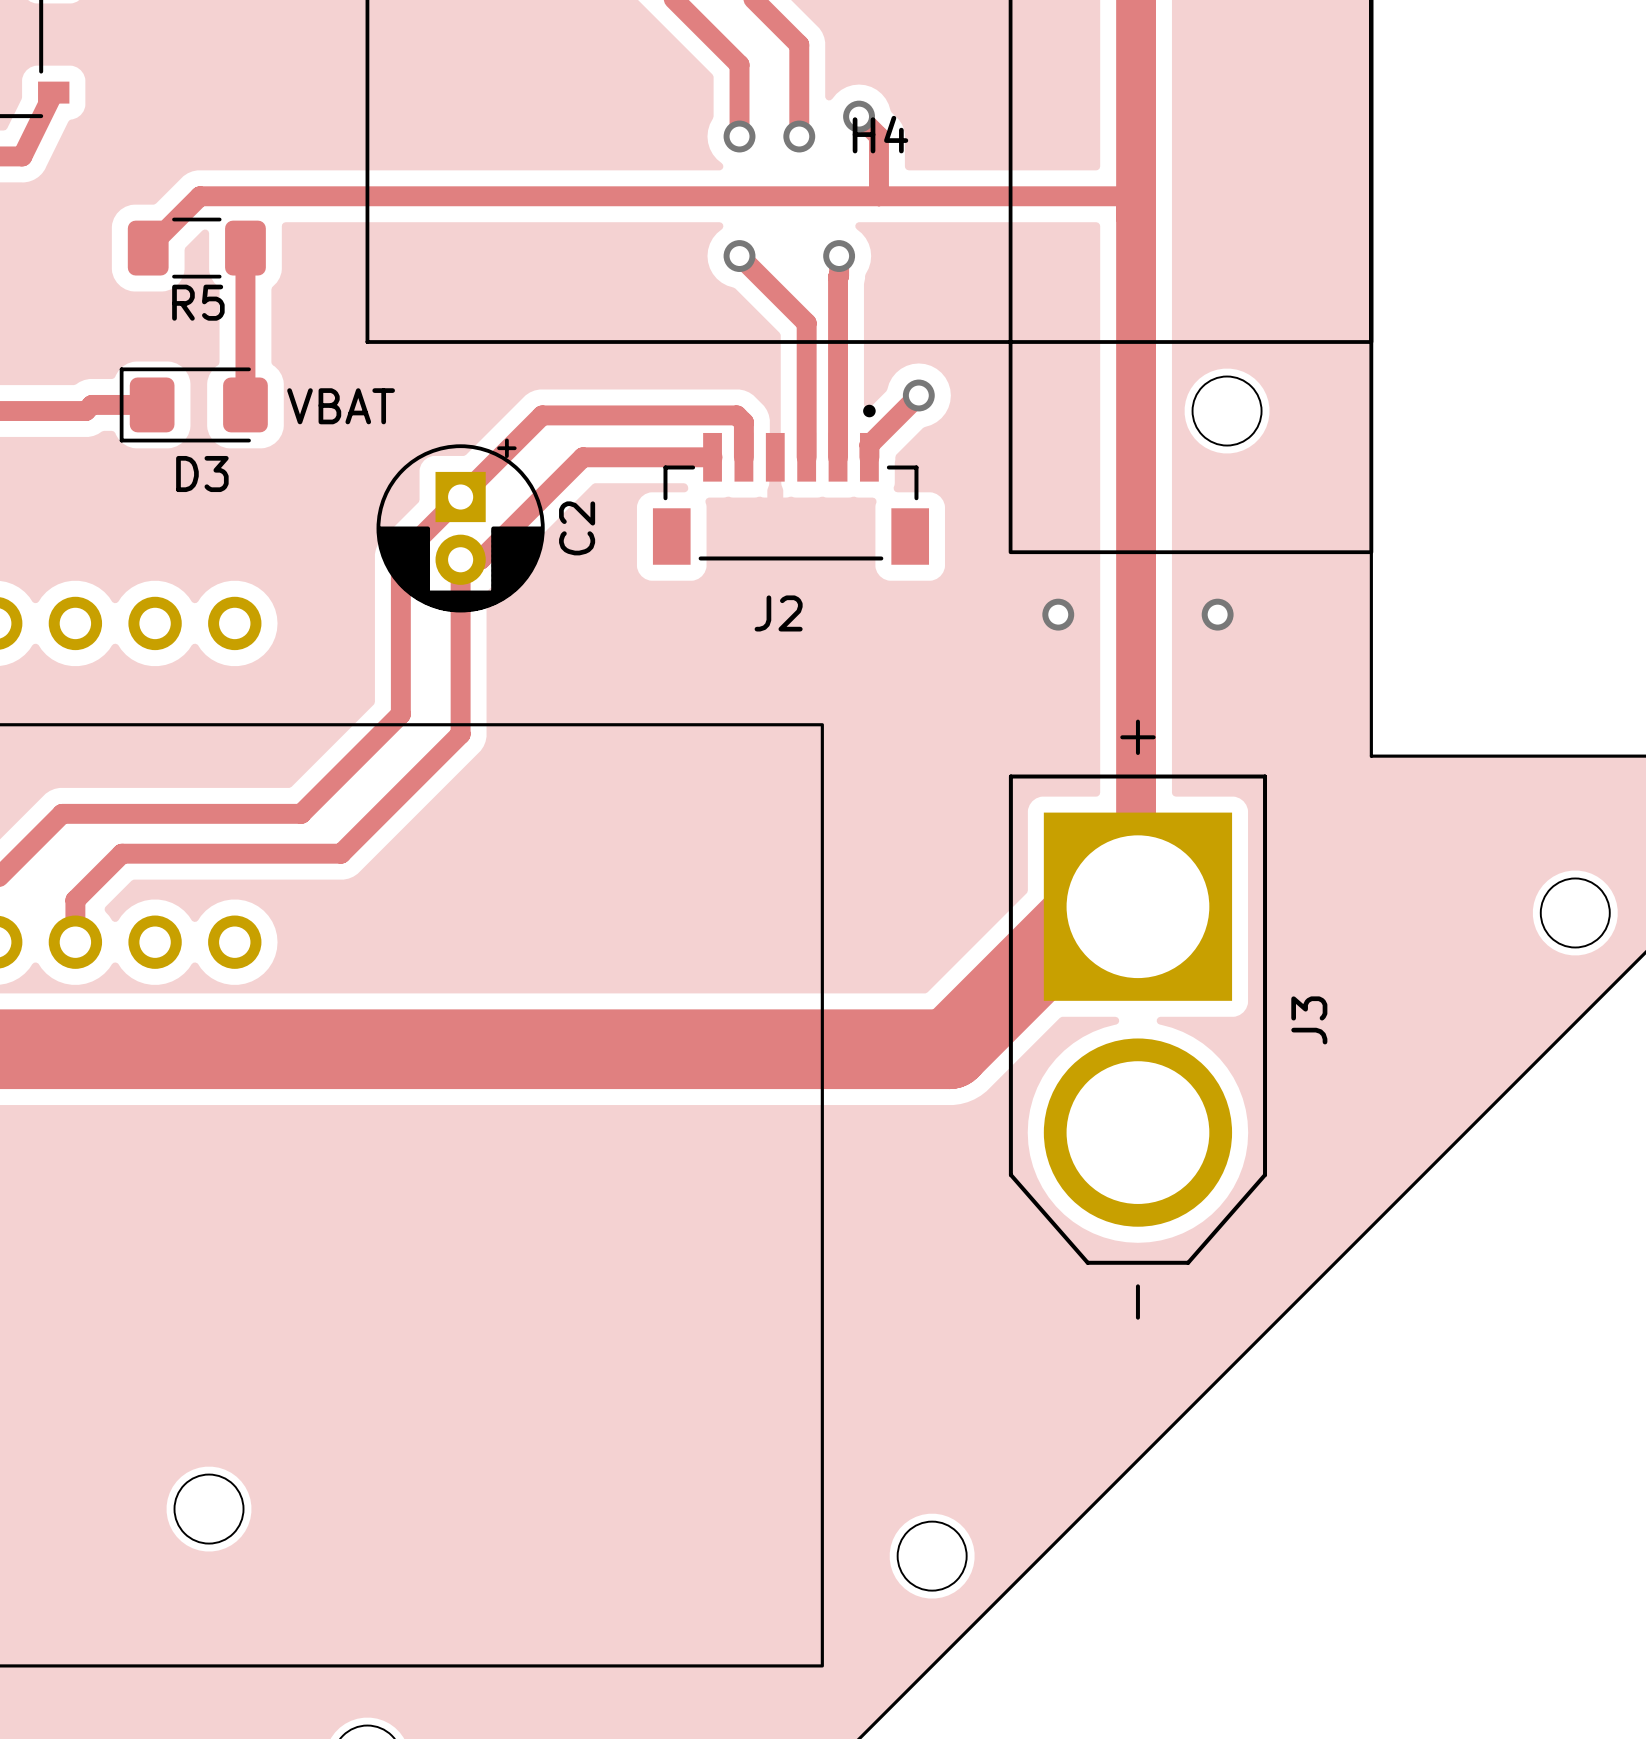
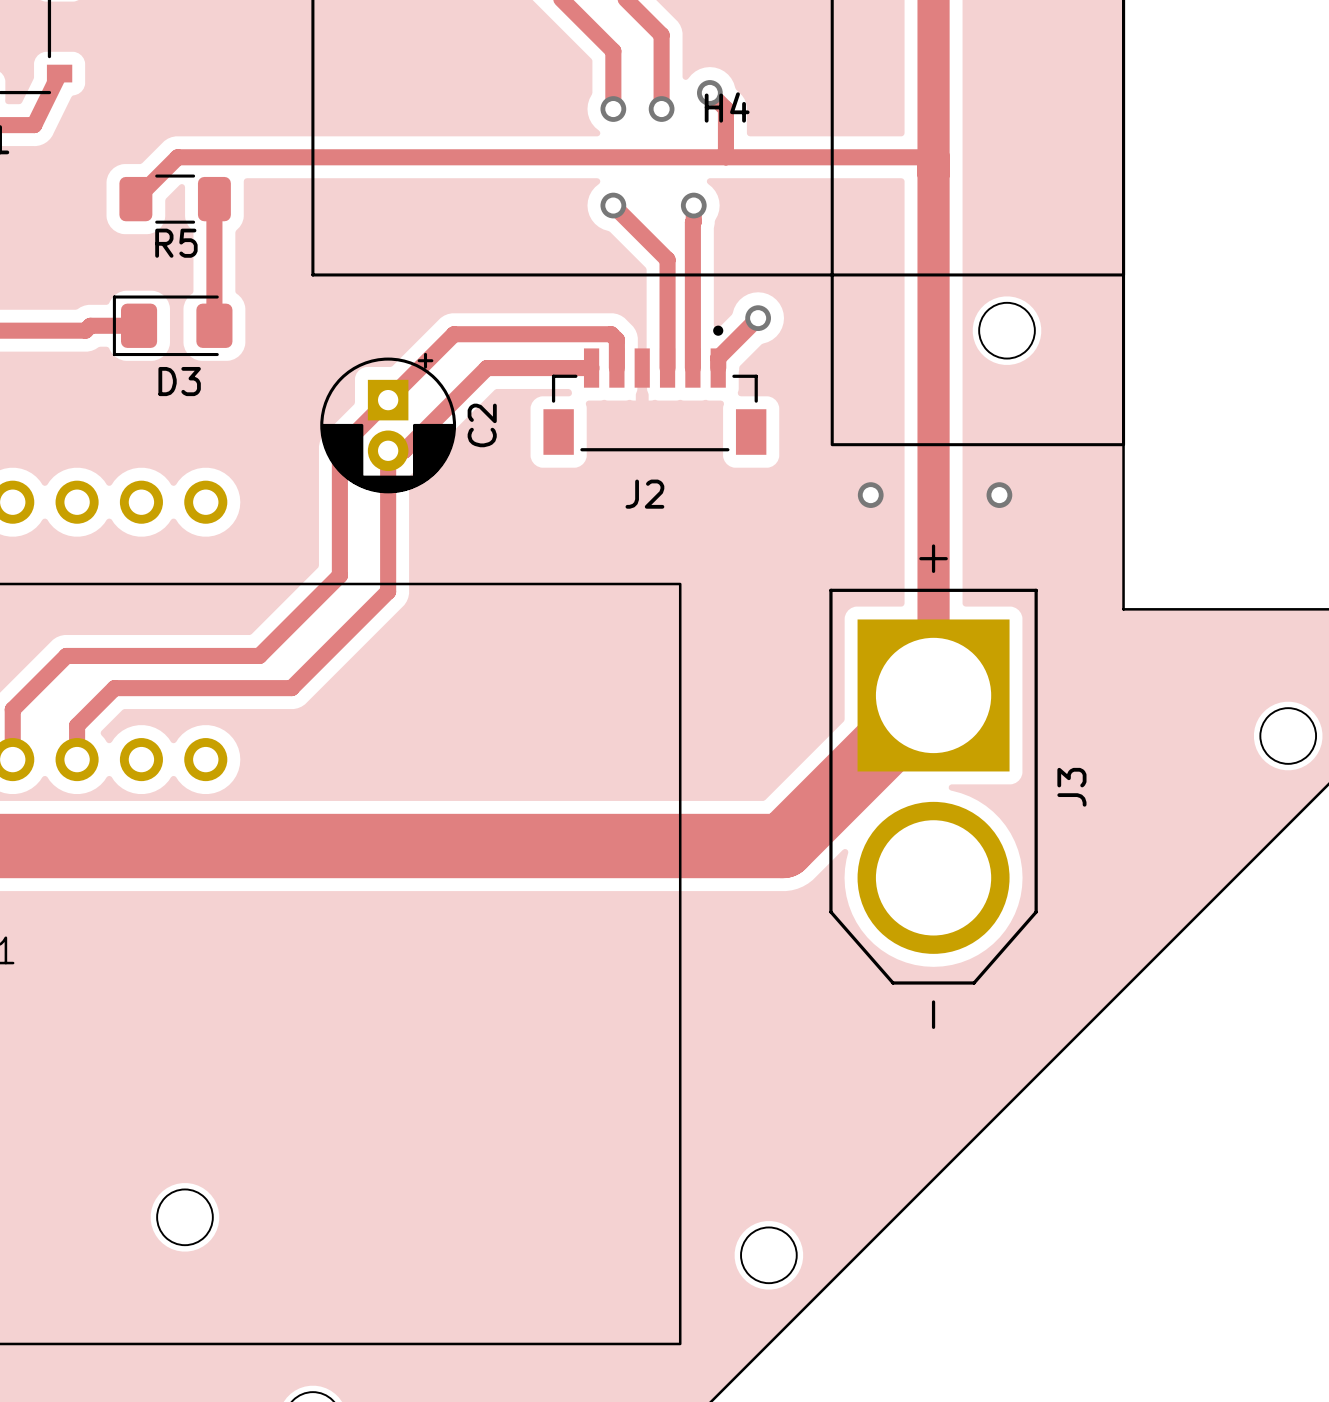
D3 value: VBAT (341, 406) -> none
J3 position: (1137, 1019) -> (933, 786)

